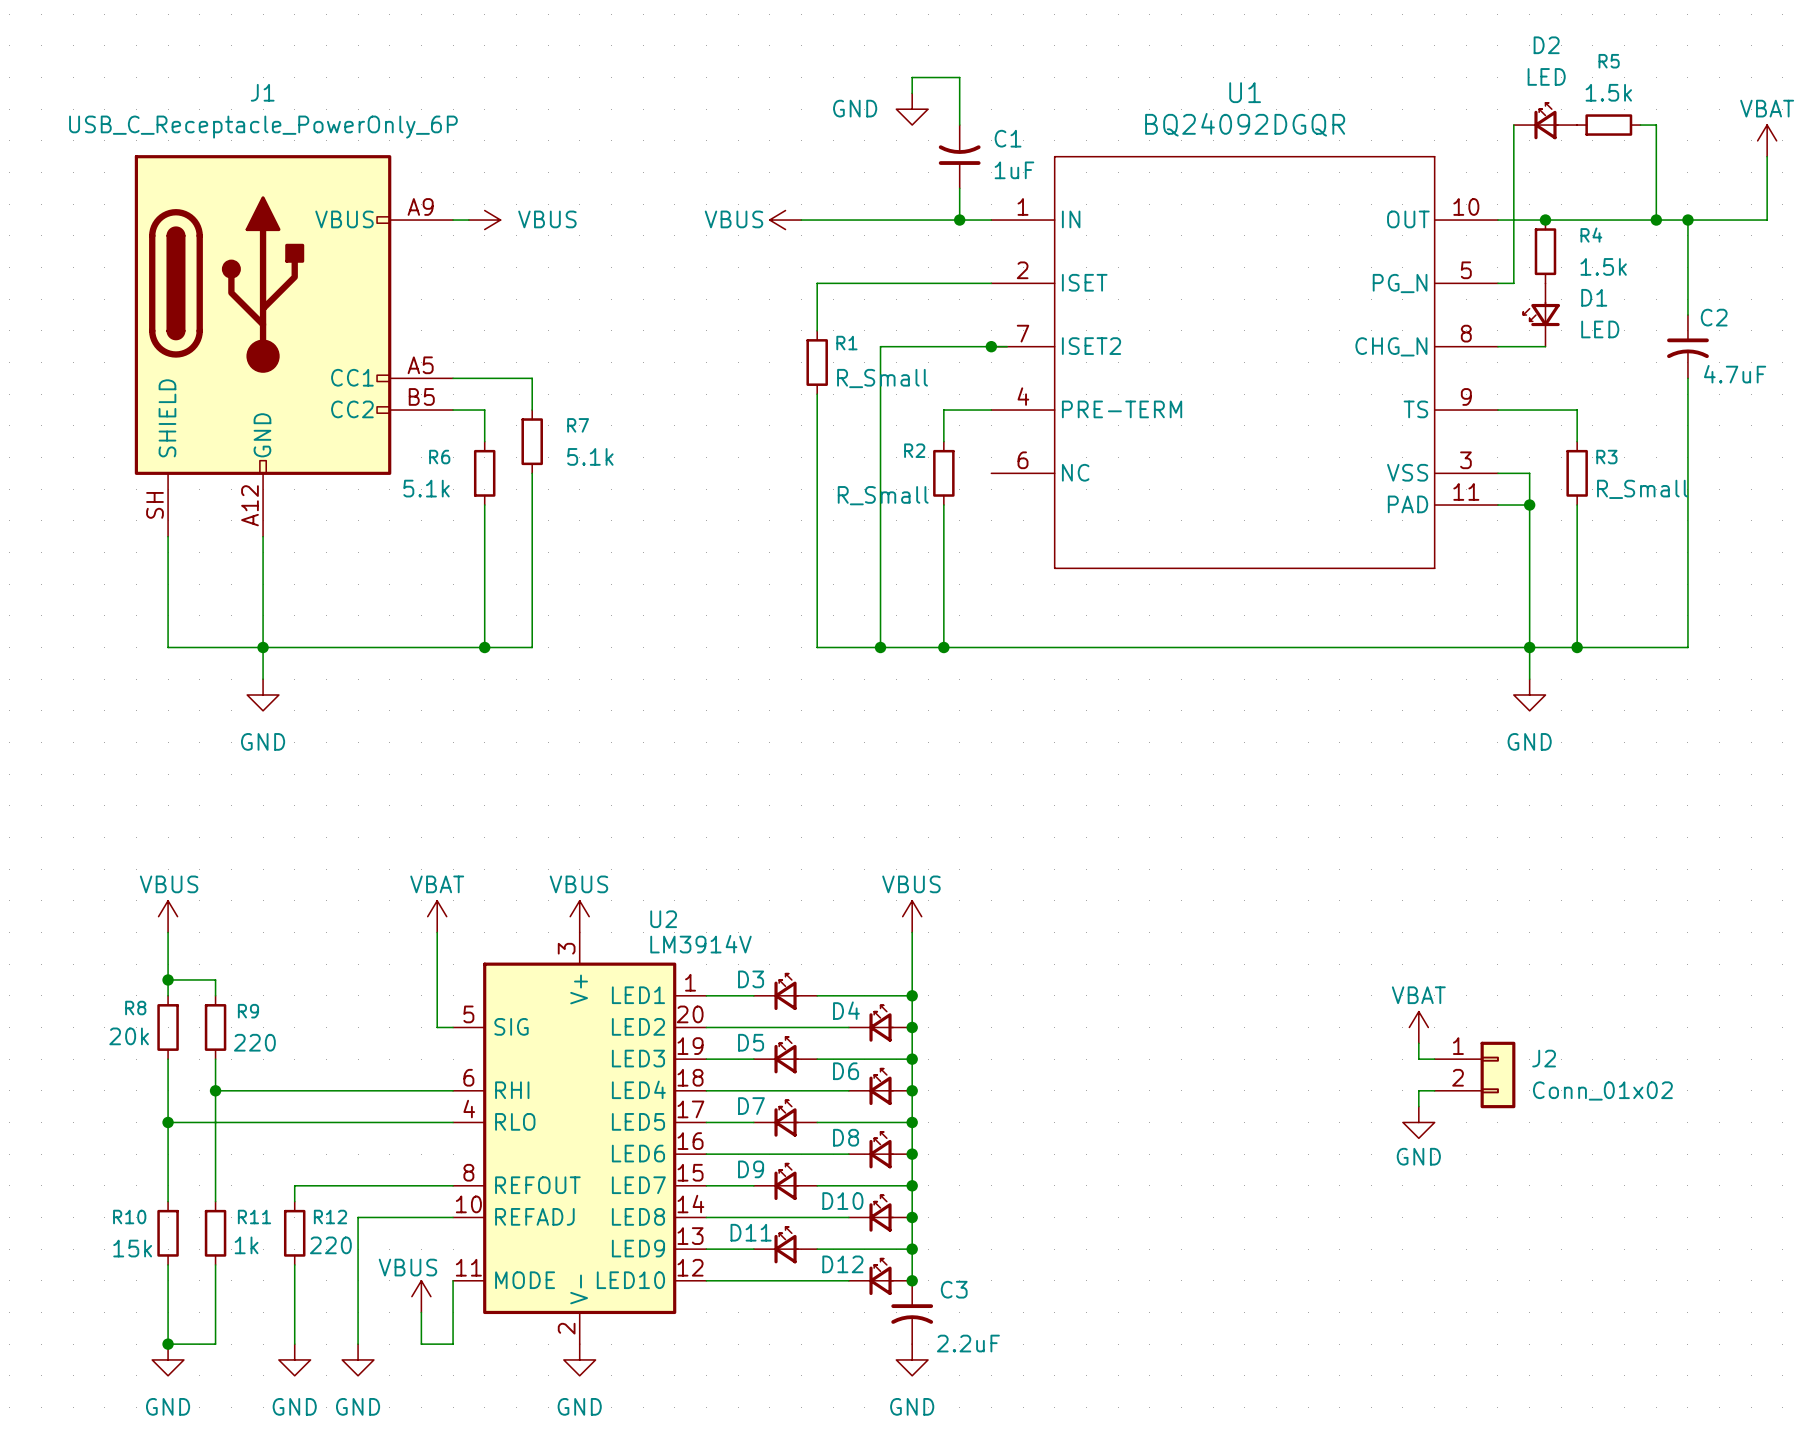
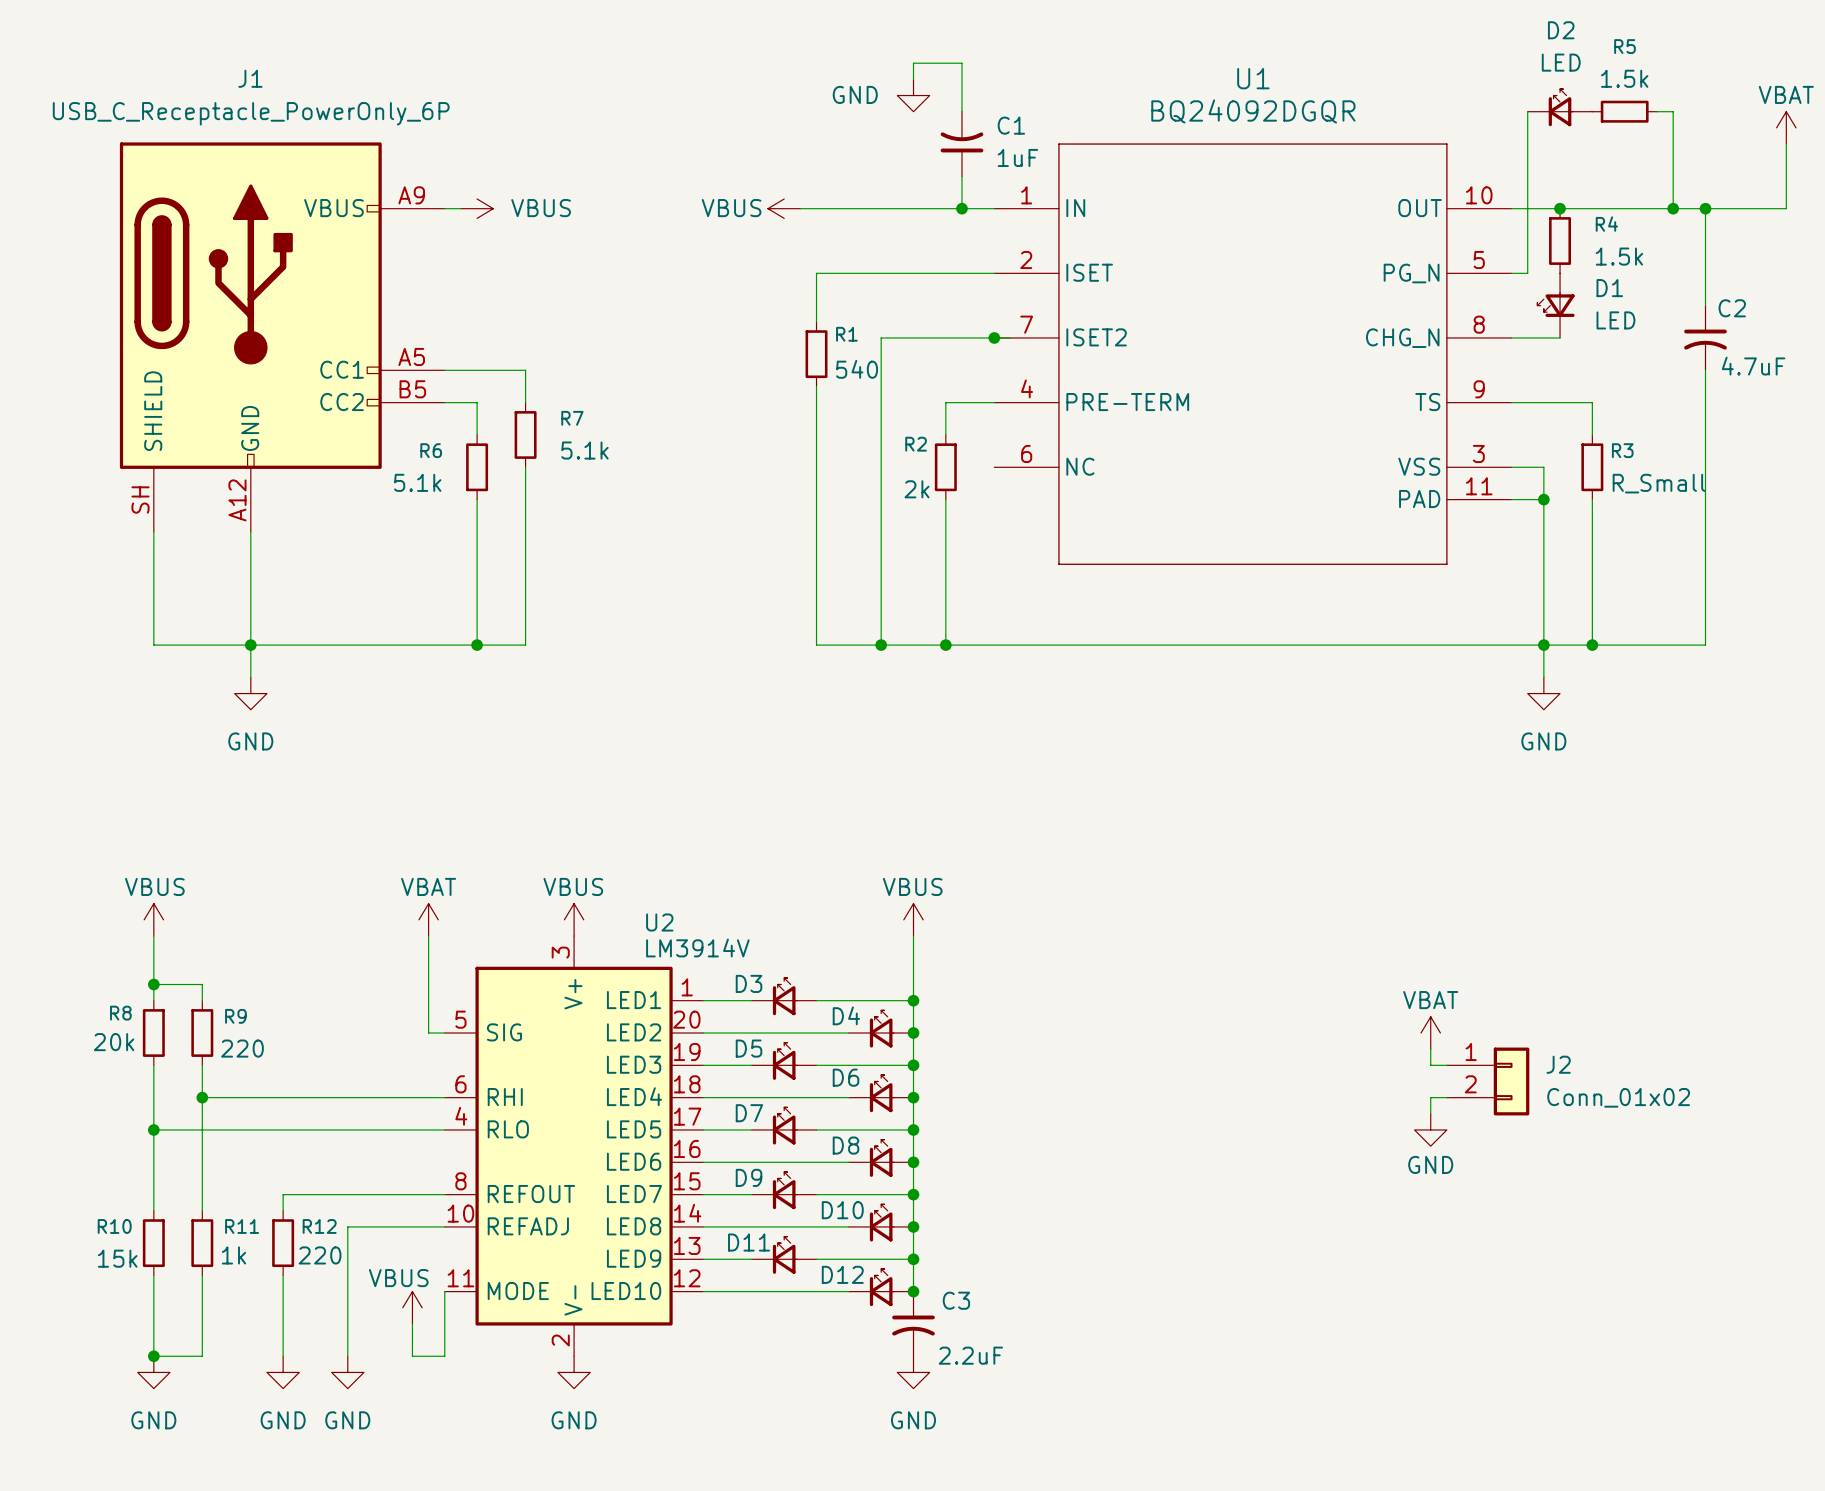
R1 value: R_Small (882, 378) -> 540 (857, 369)
R2 value: R_Small (883, 495) -> 2k (917, 489)

